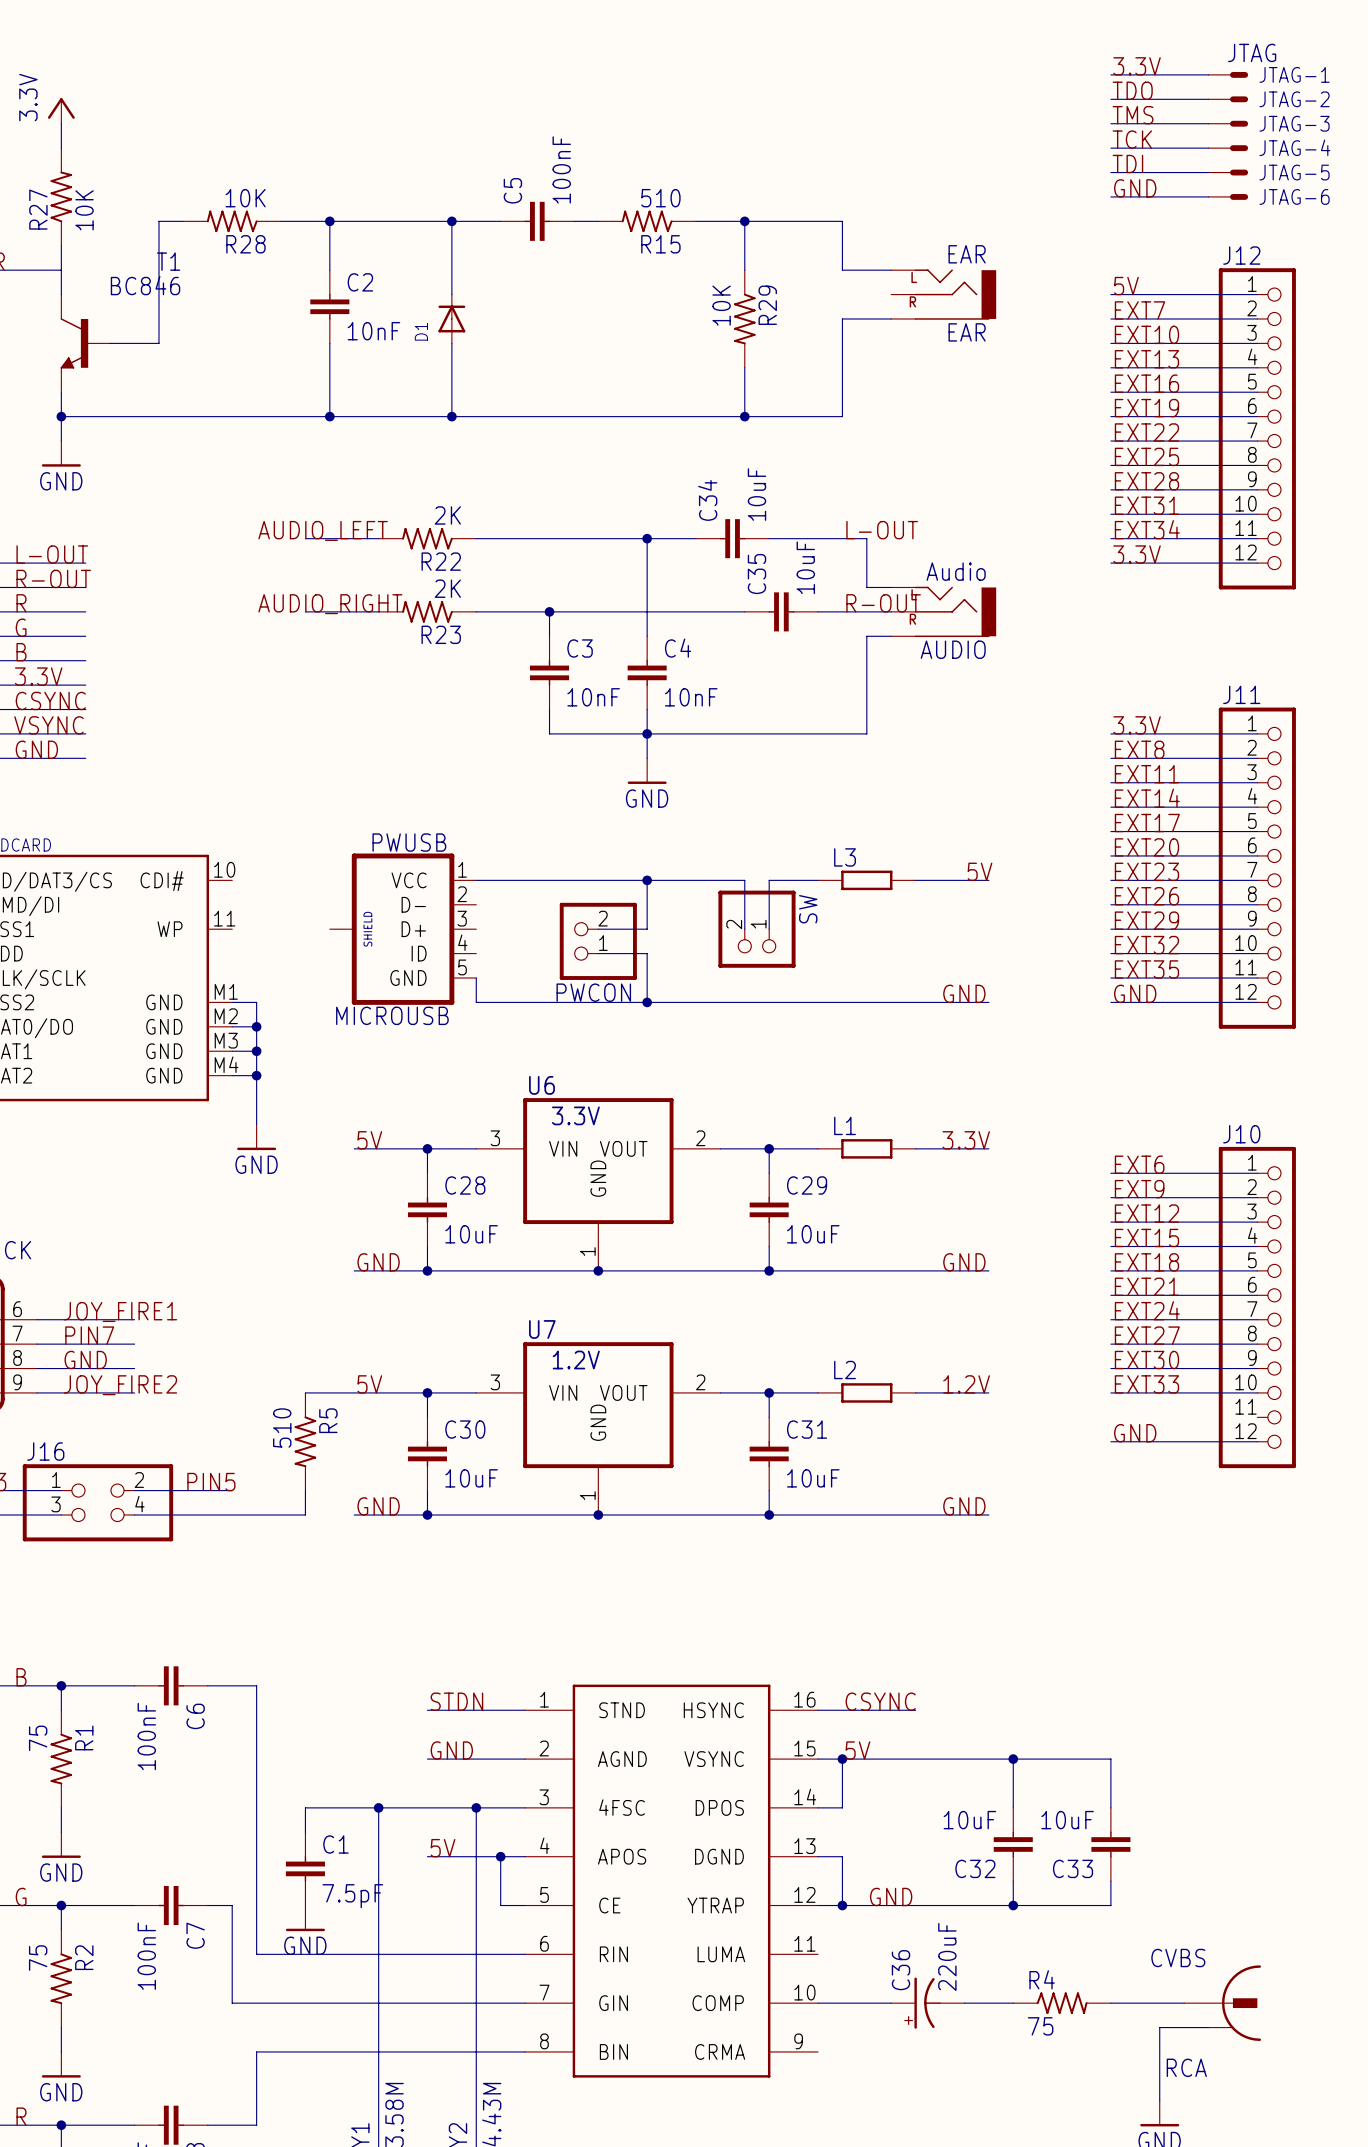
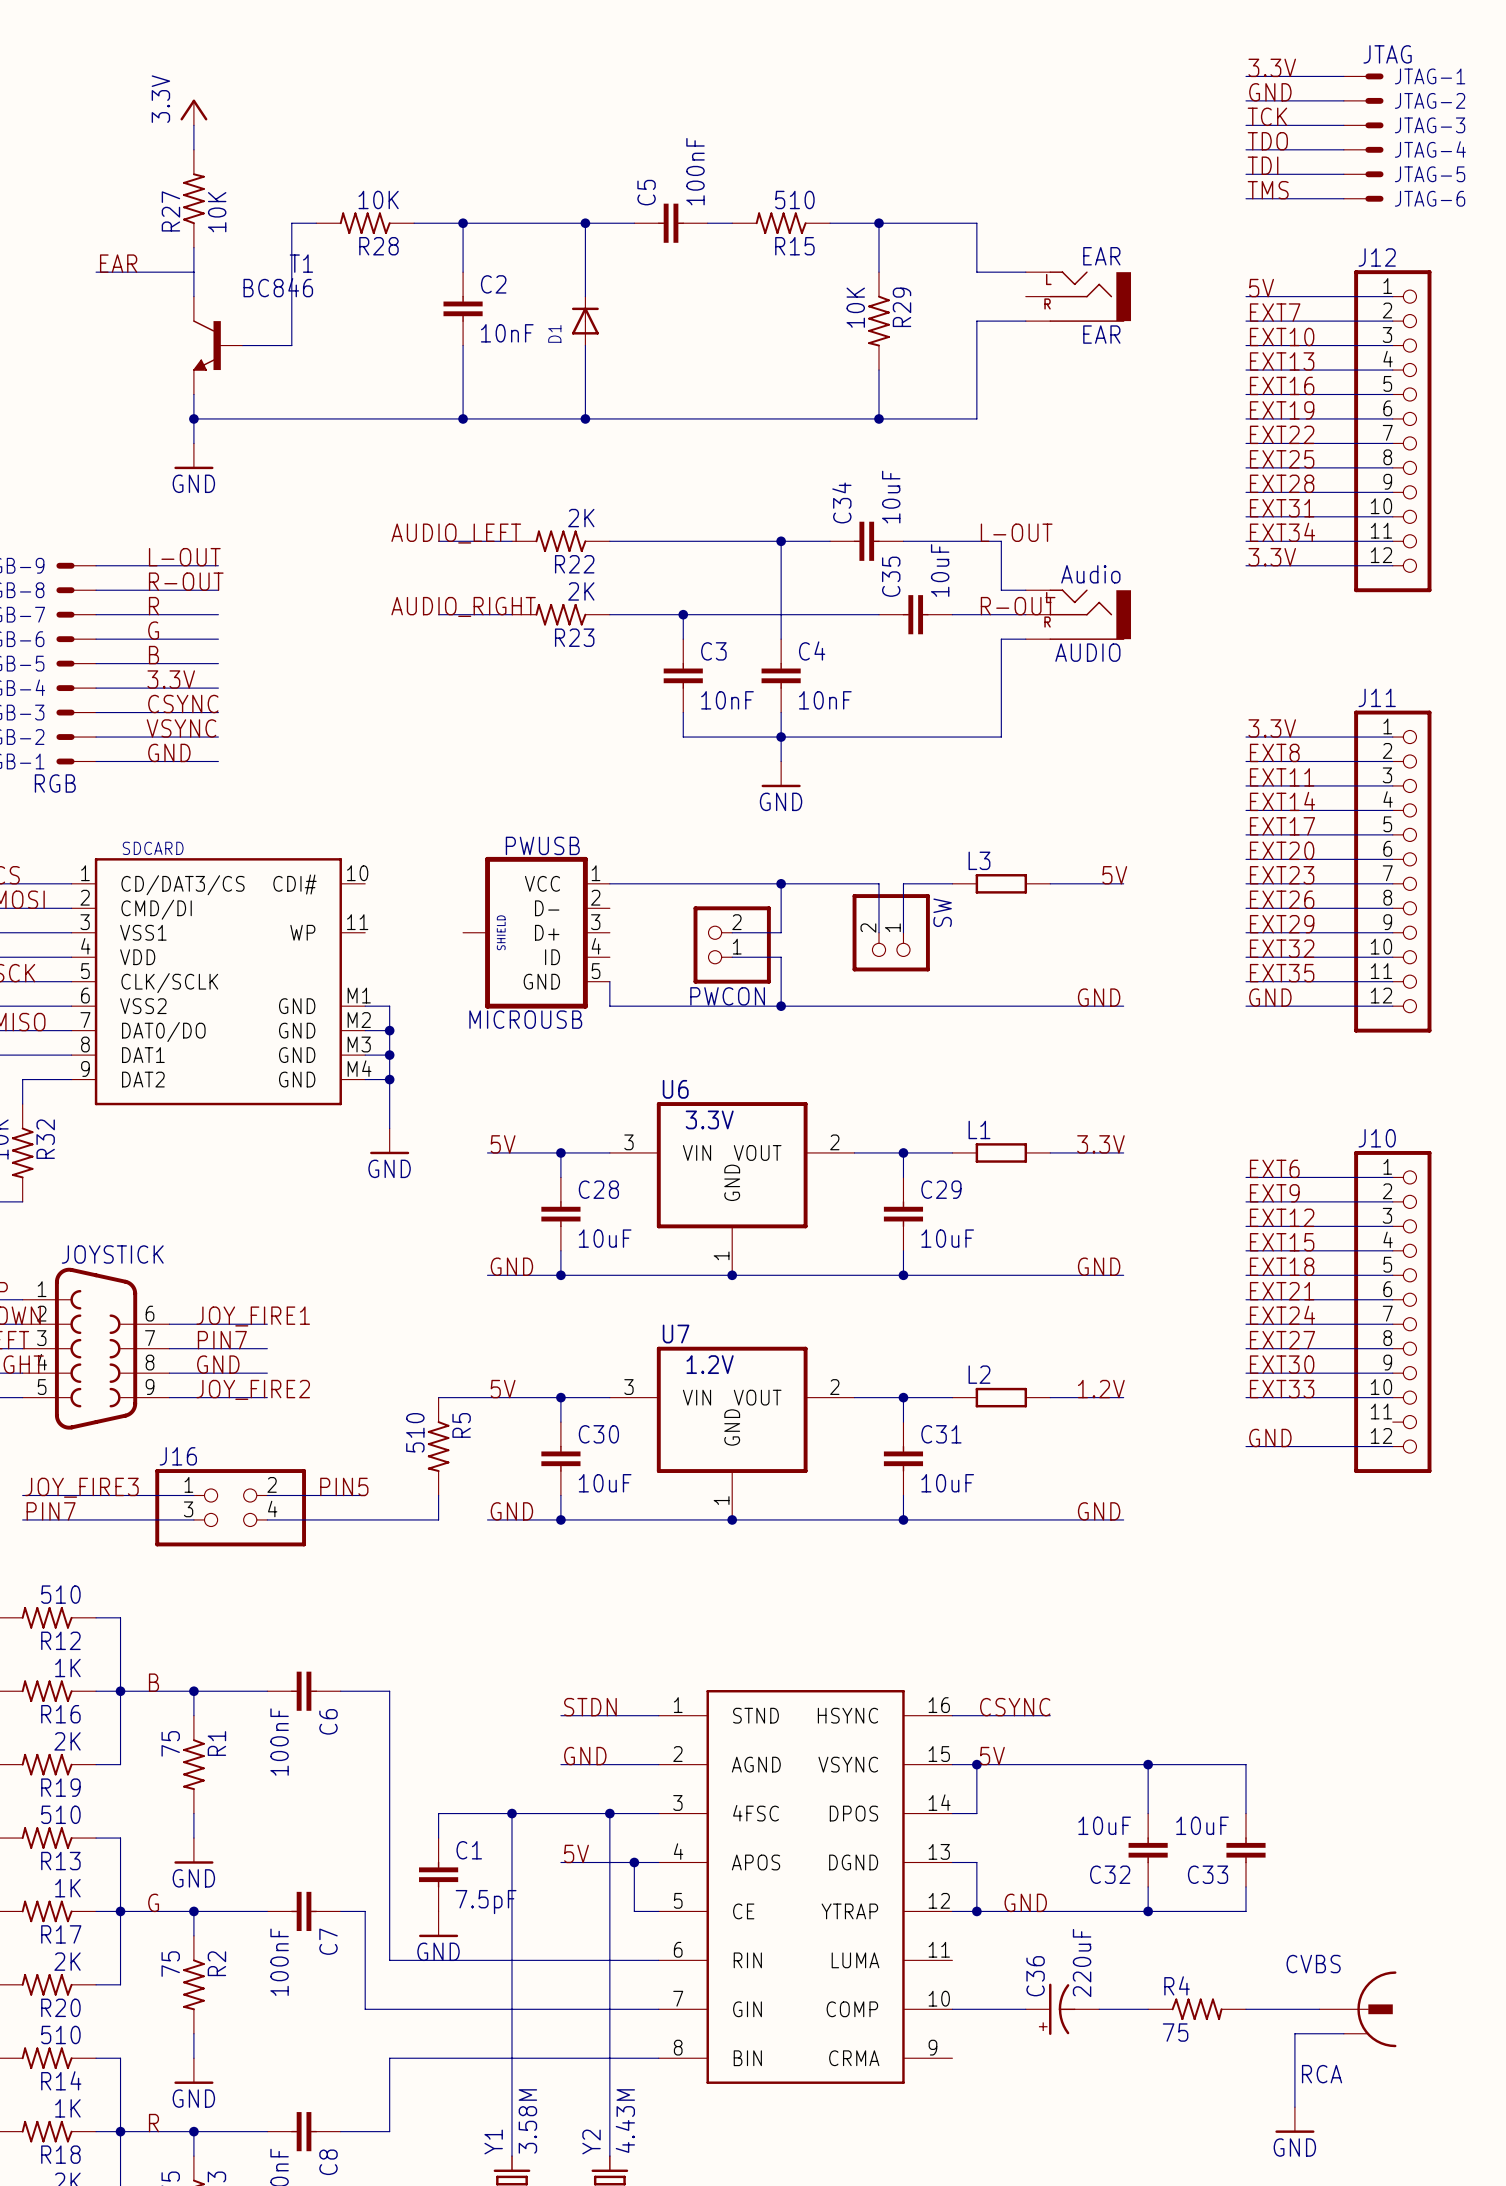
label: TDO (1132, 90) -> GND (1270, 92)
label: TMS (1133, 115) -> TCK (1267, 116)
label: TCK (1132, 139) -> TDO (1267, 141)
label: GND (1135, 188) -> TMS (1268, 190)

